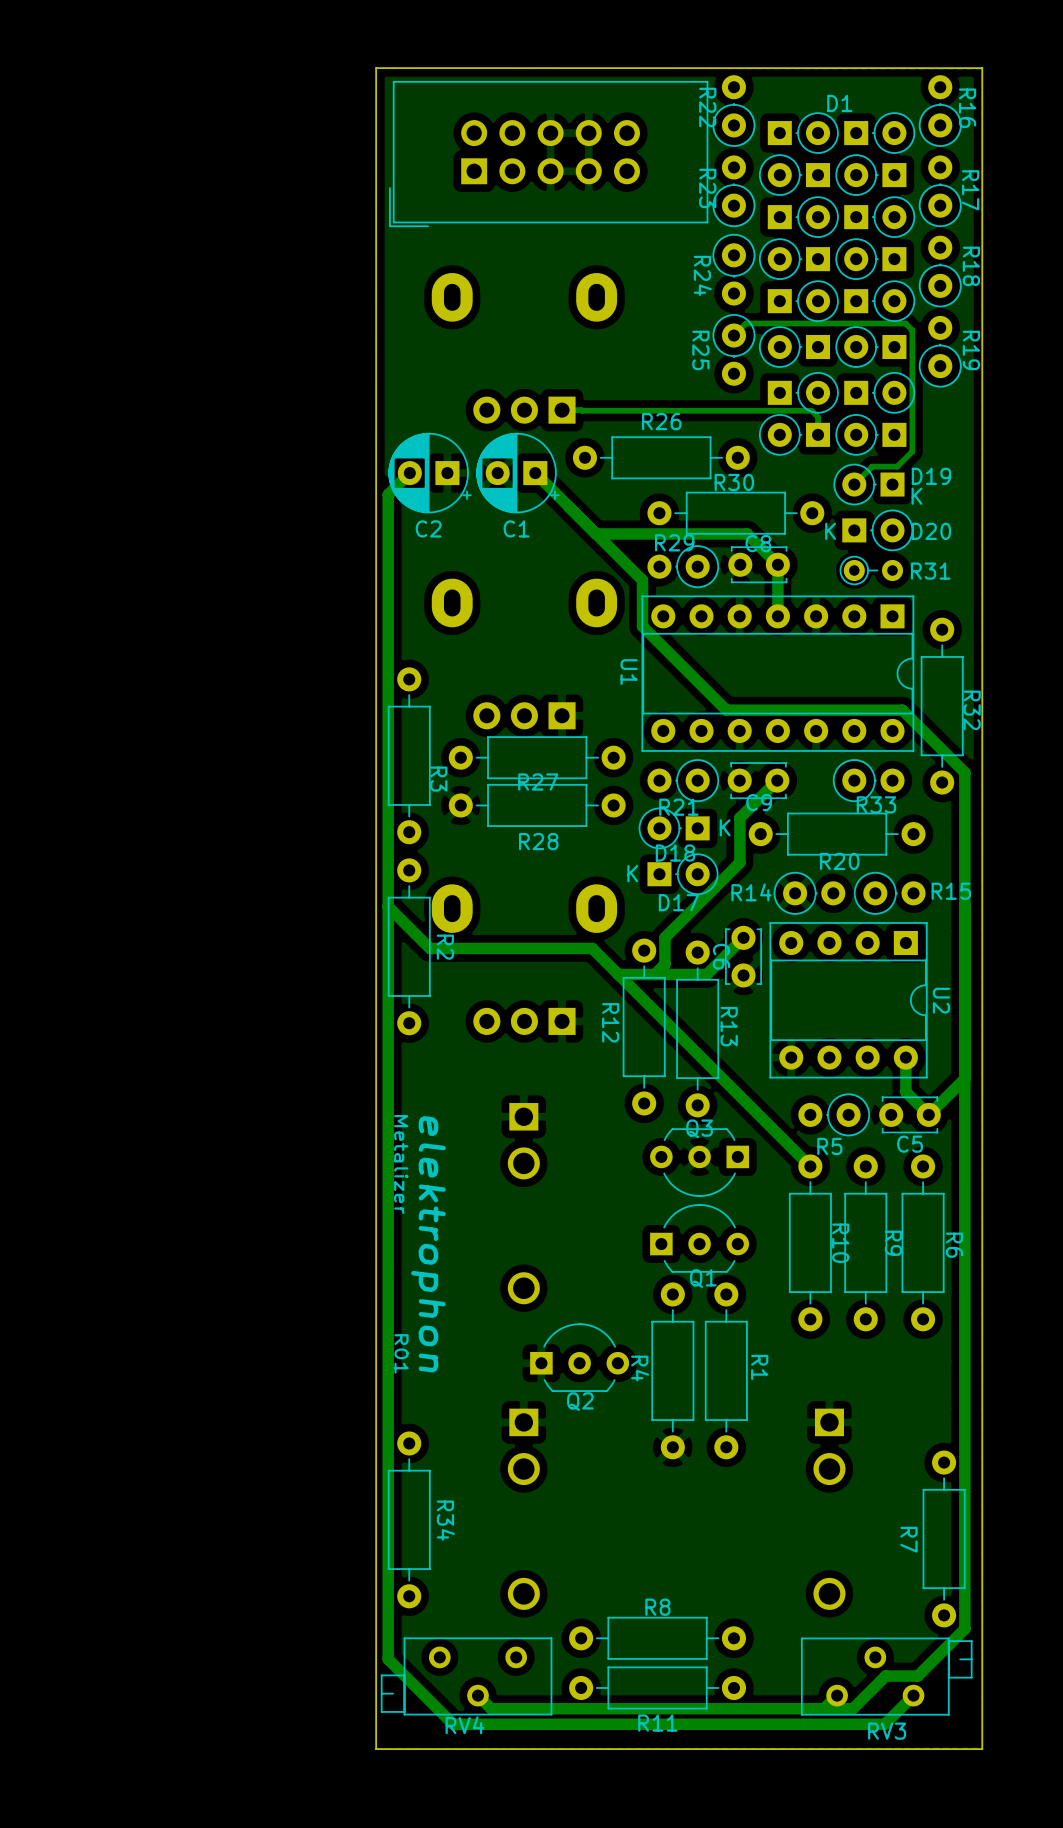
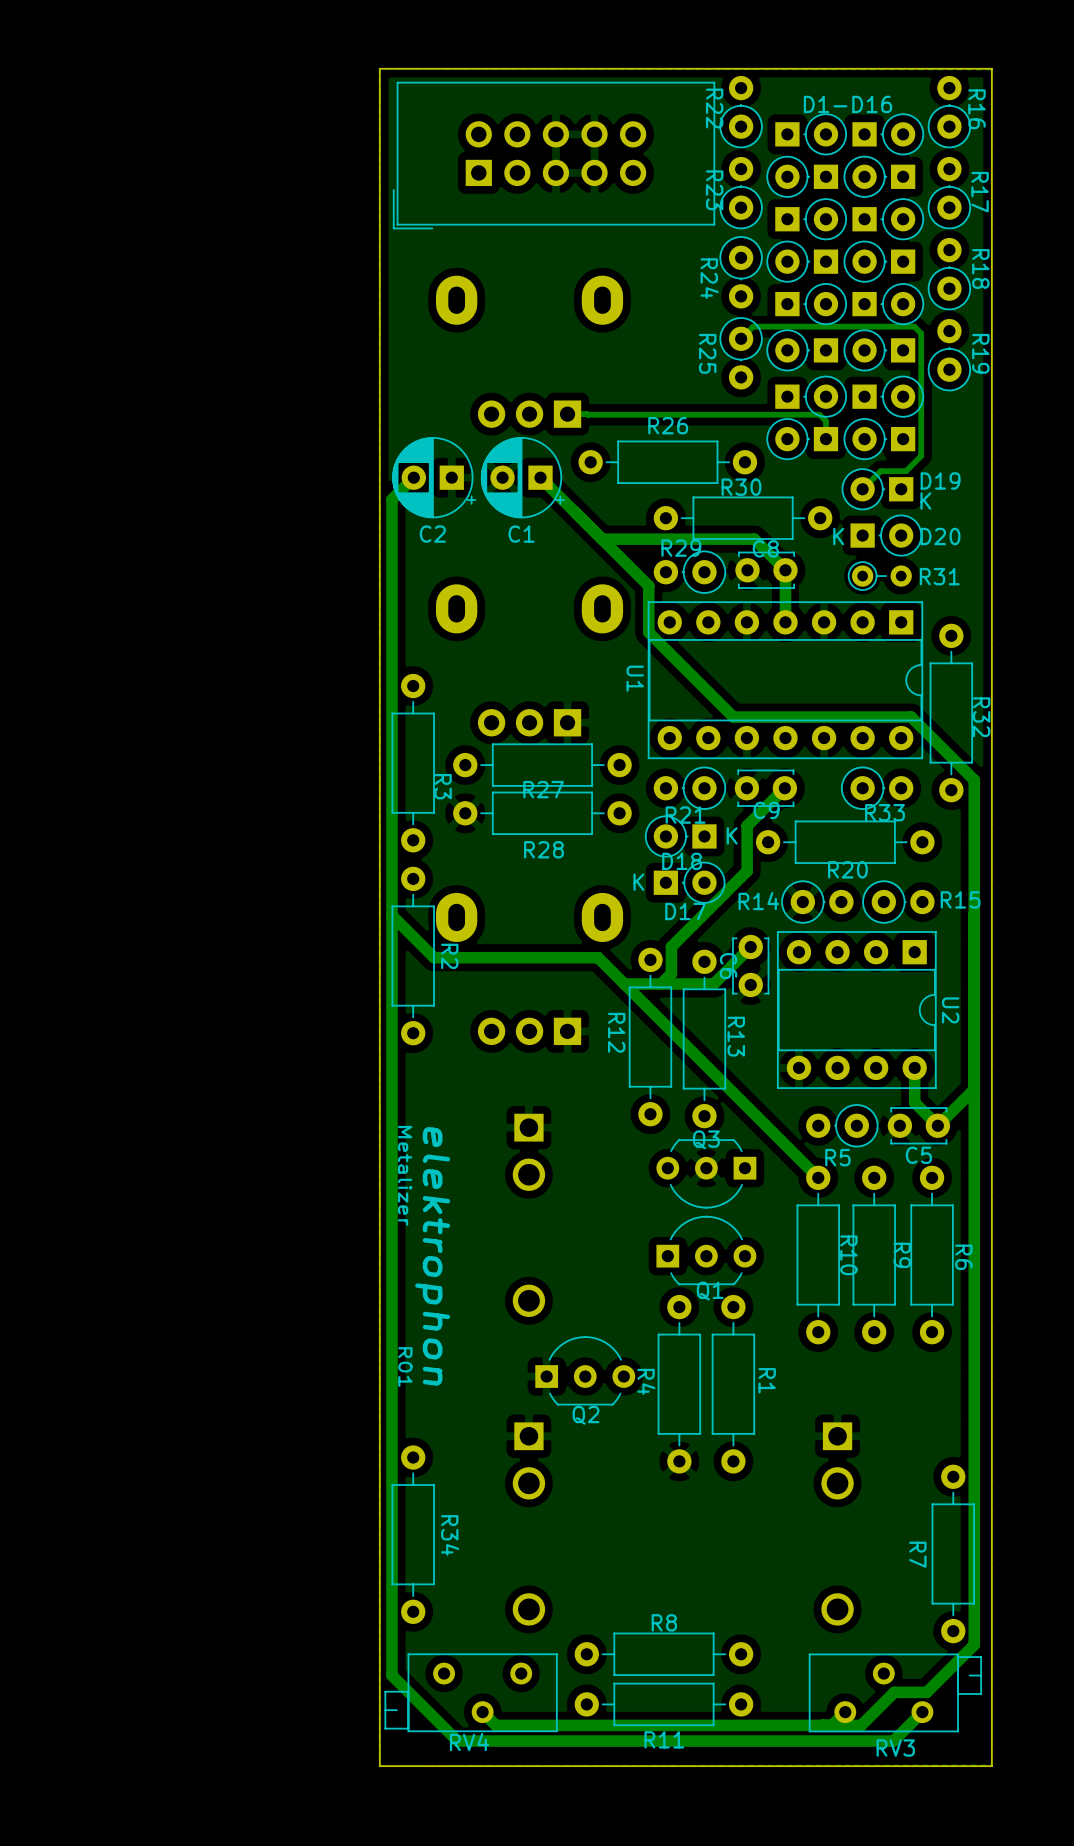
D1 name: D1 (839, 103) -> D1-D16 (847, 104)

